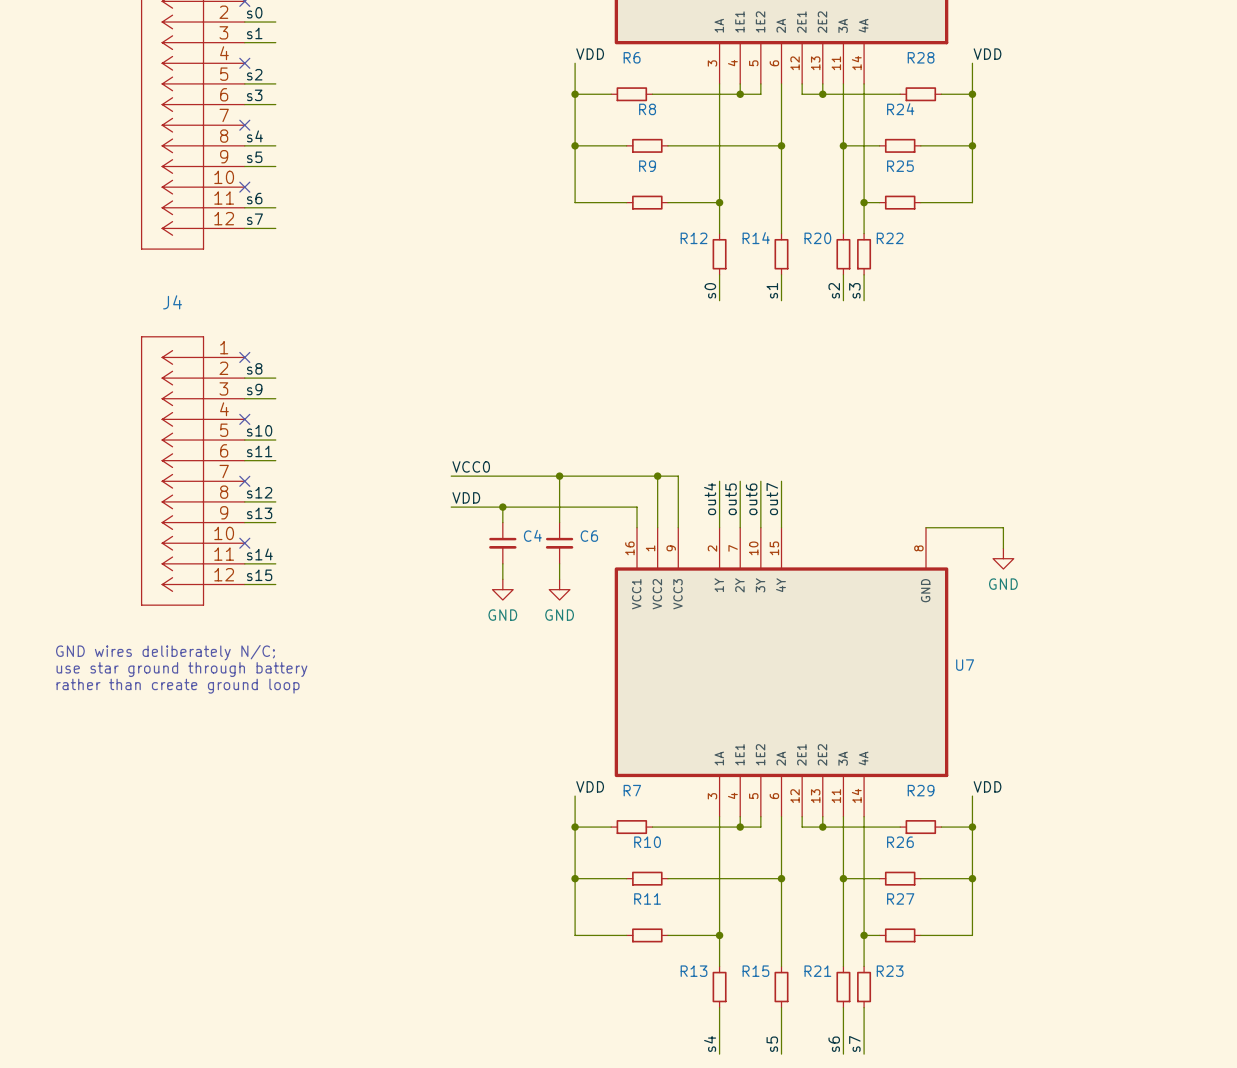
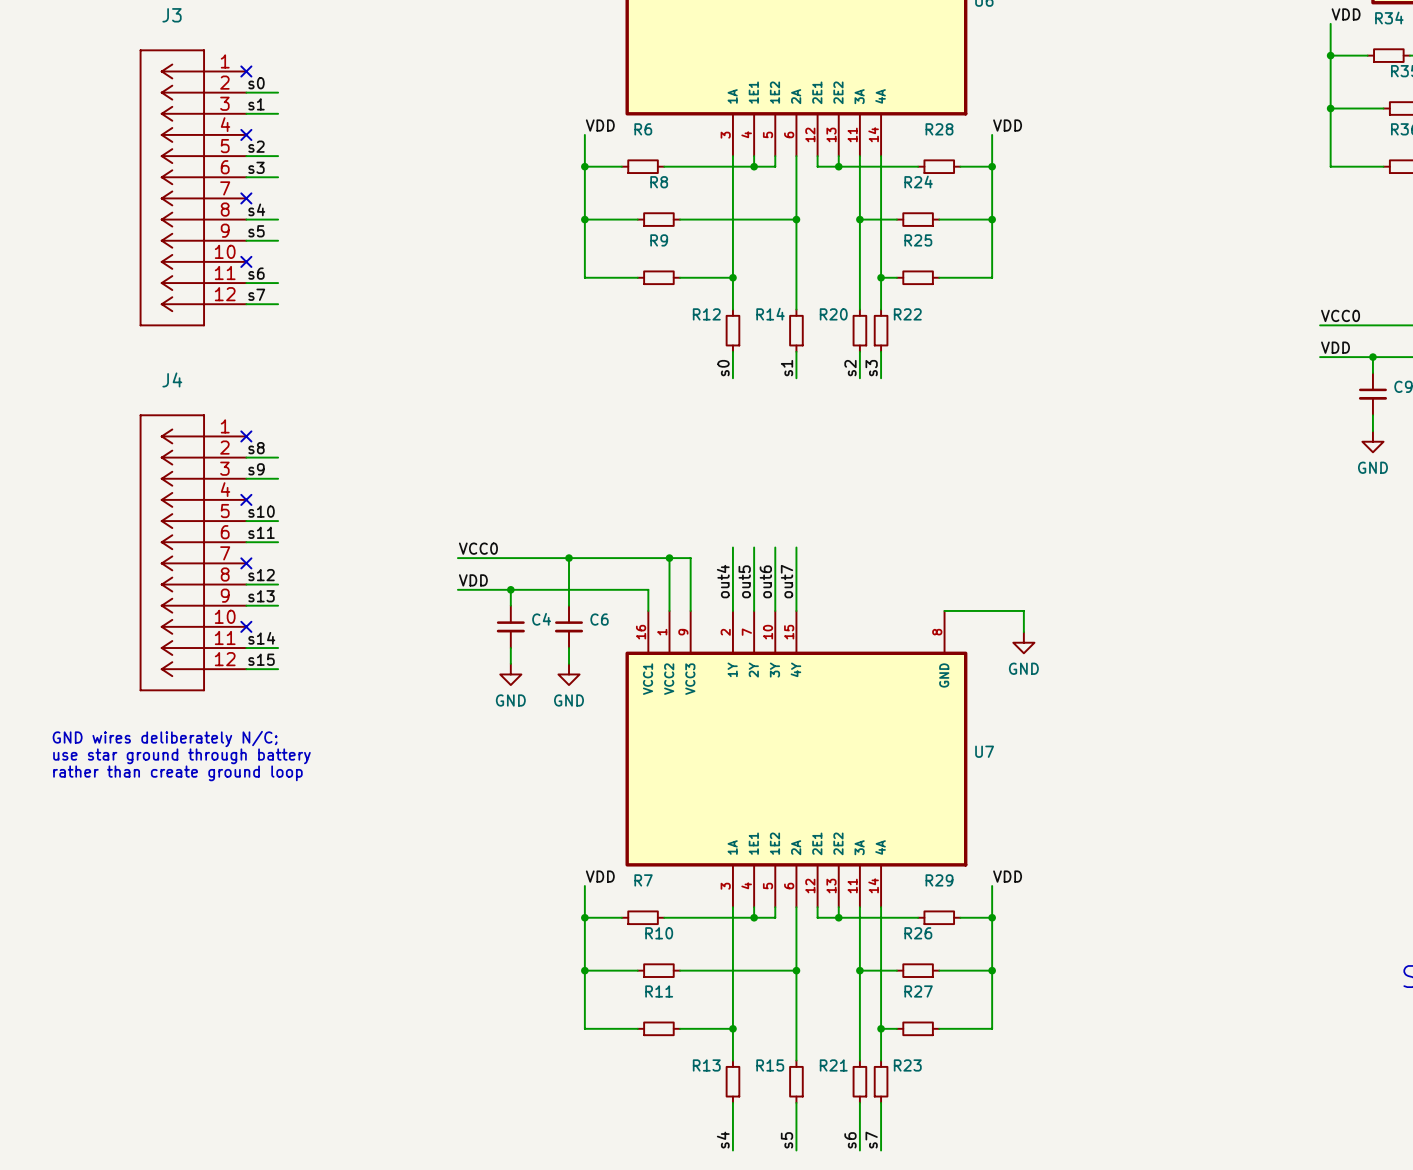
wire: none -> (732, 547) (732, 563)
wire: none -> (754, 547) (754, 563)
wire: none -> (775, 547) (775, 563)
wire: none -> (796, 547) (796, 563)

